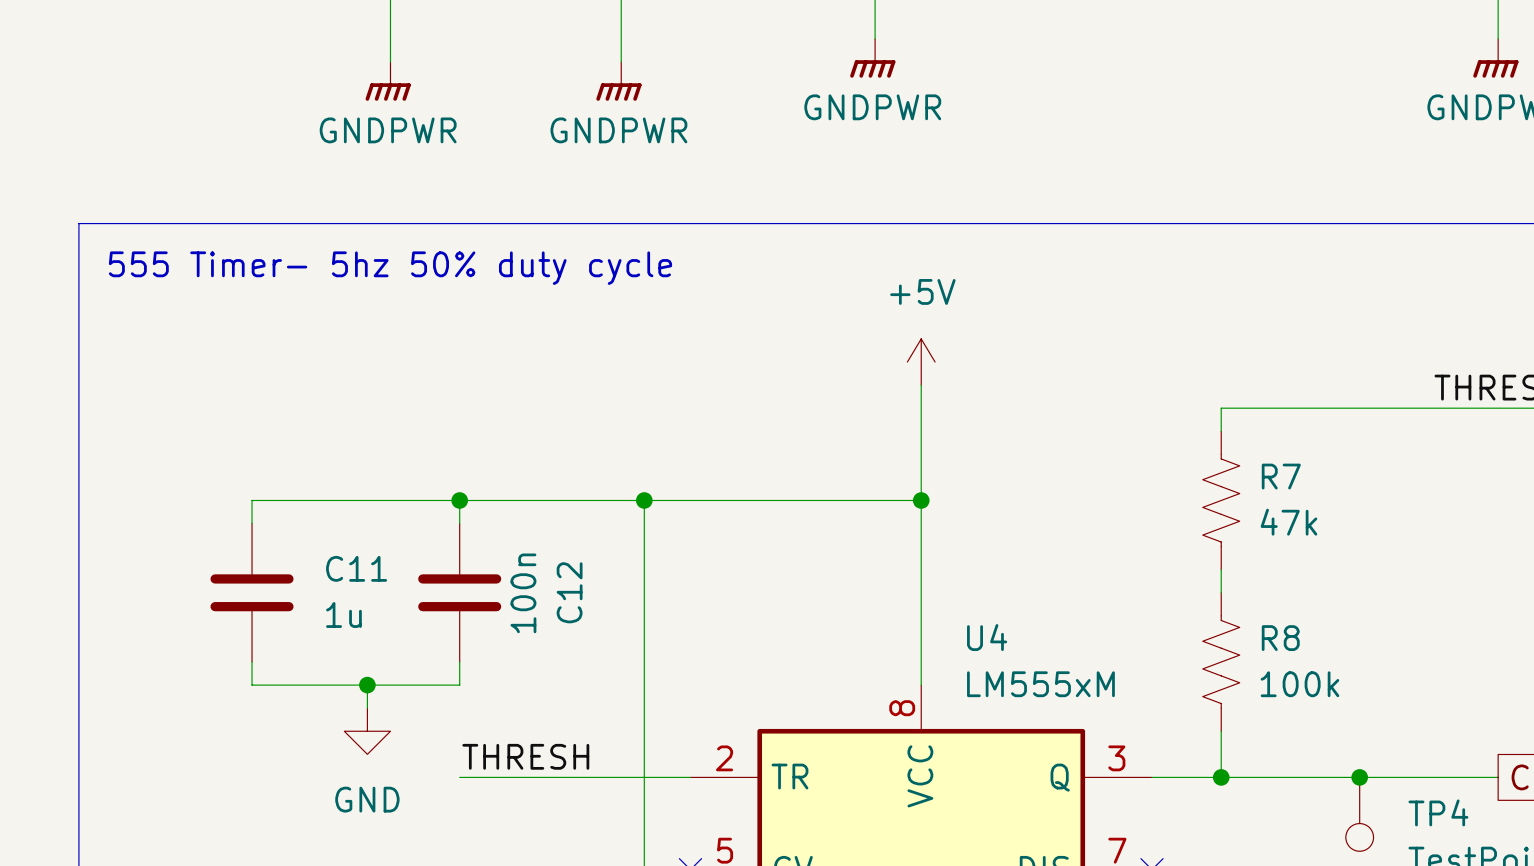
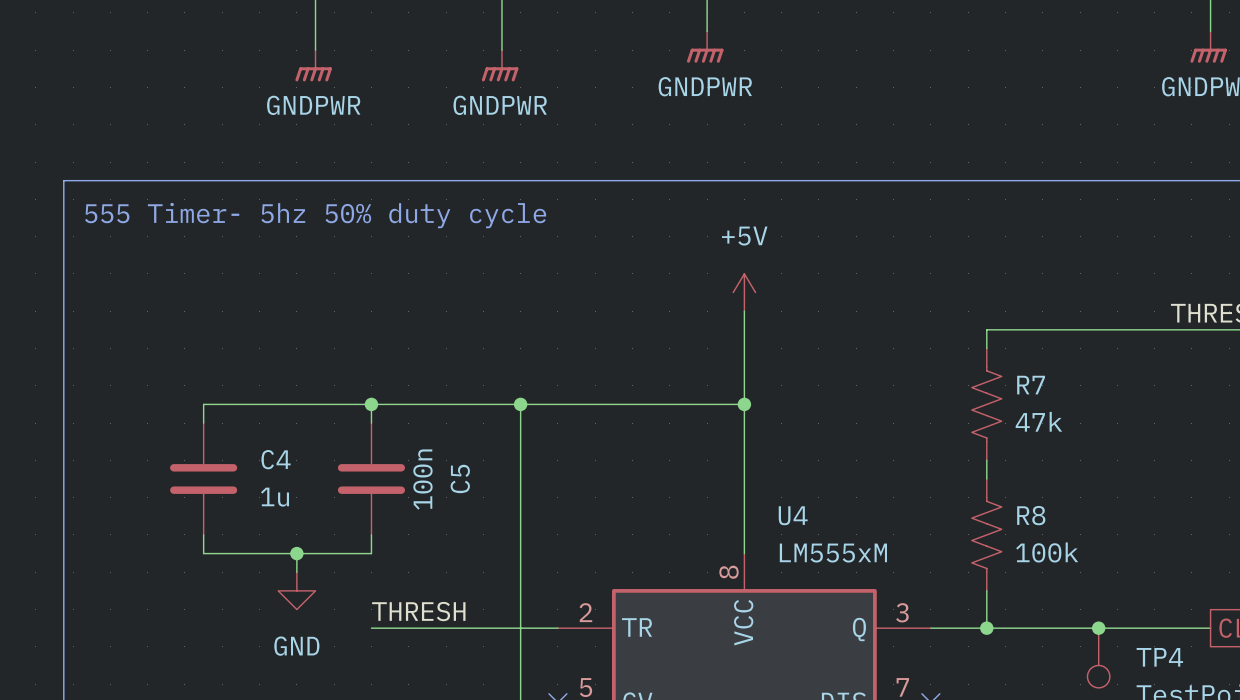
C11 name: C11 (356, 568) -> C4 (276, 459)
C12 name: C12 (569, 592) -> C5 (460, 478)

